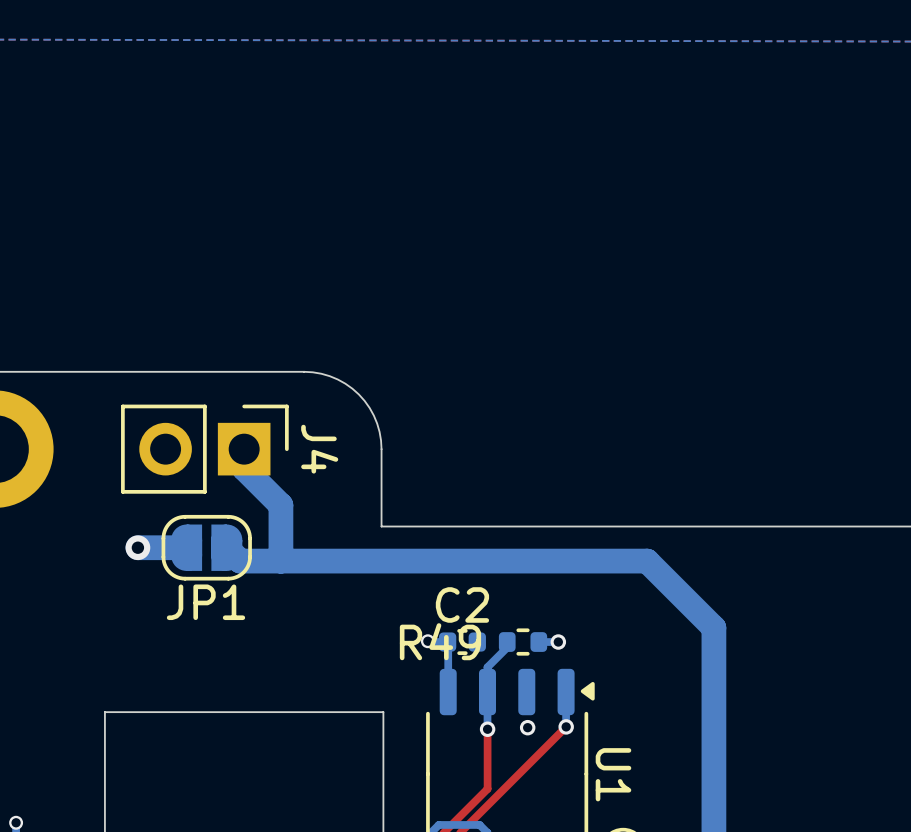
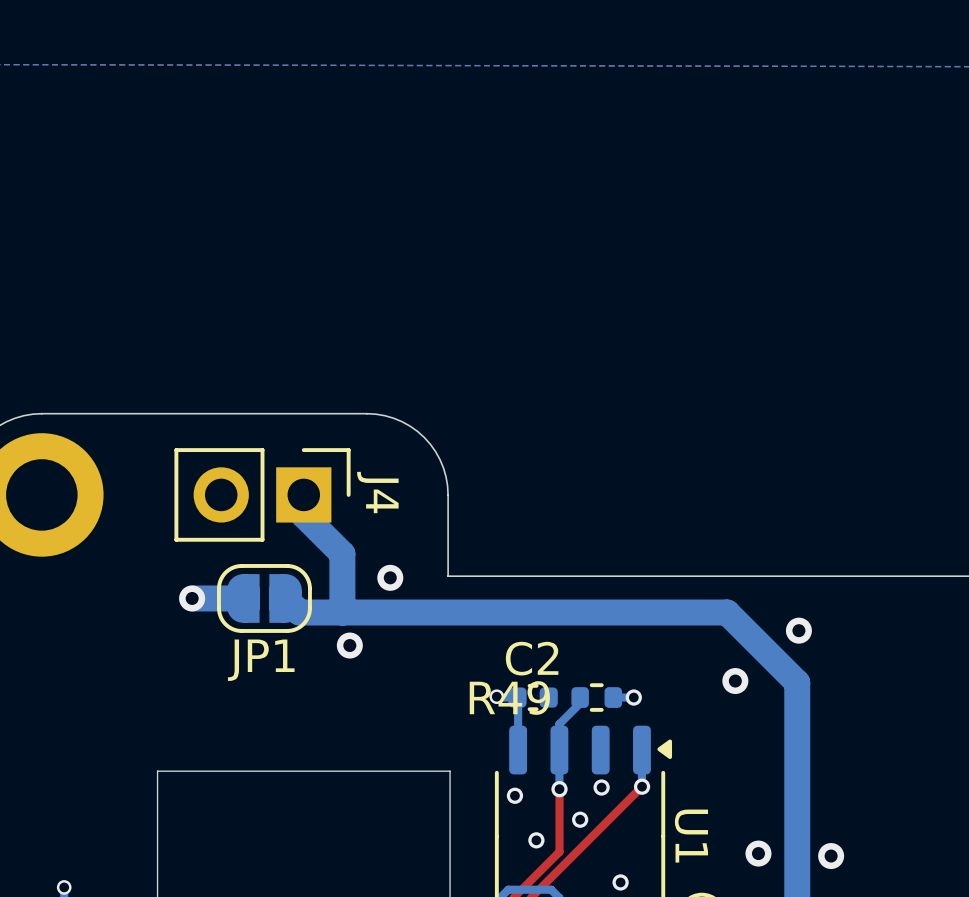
via: none -> (390, 577)
via: none -> (798, 630)
via: none -> (349, 645)
via: none -> (735, 681)
via: none -> (514, 795)
via: none -> (580, 819)
via: none -> (536, 840)
via: none -> (758, 853)
via: none -> (831, 856)
via: none -> (620, 882)

